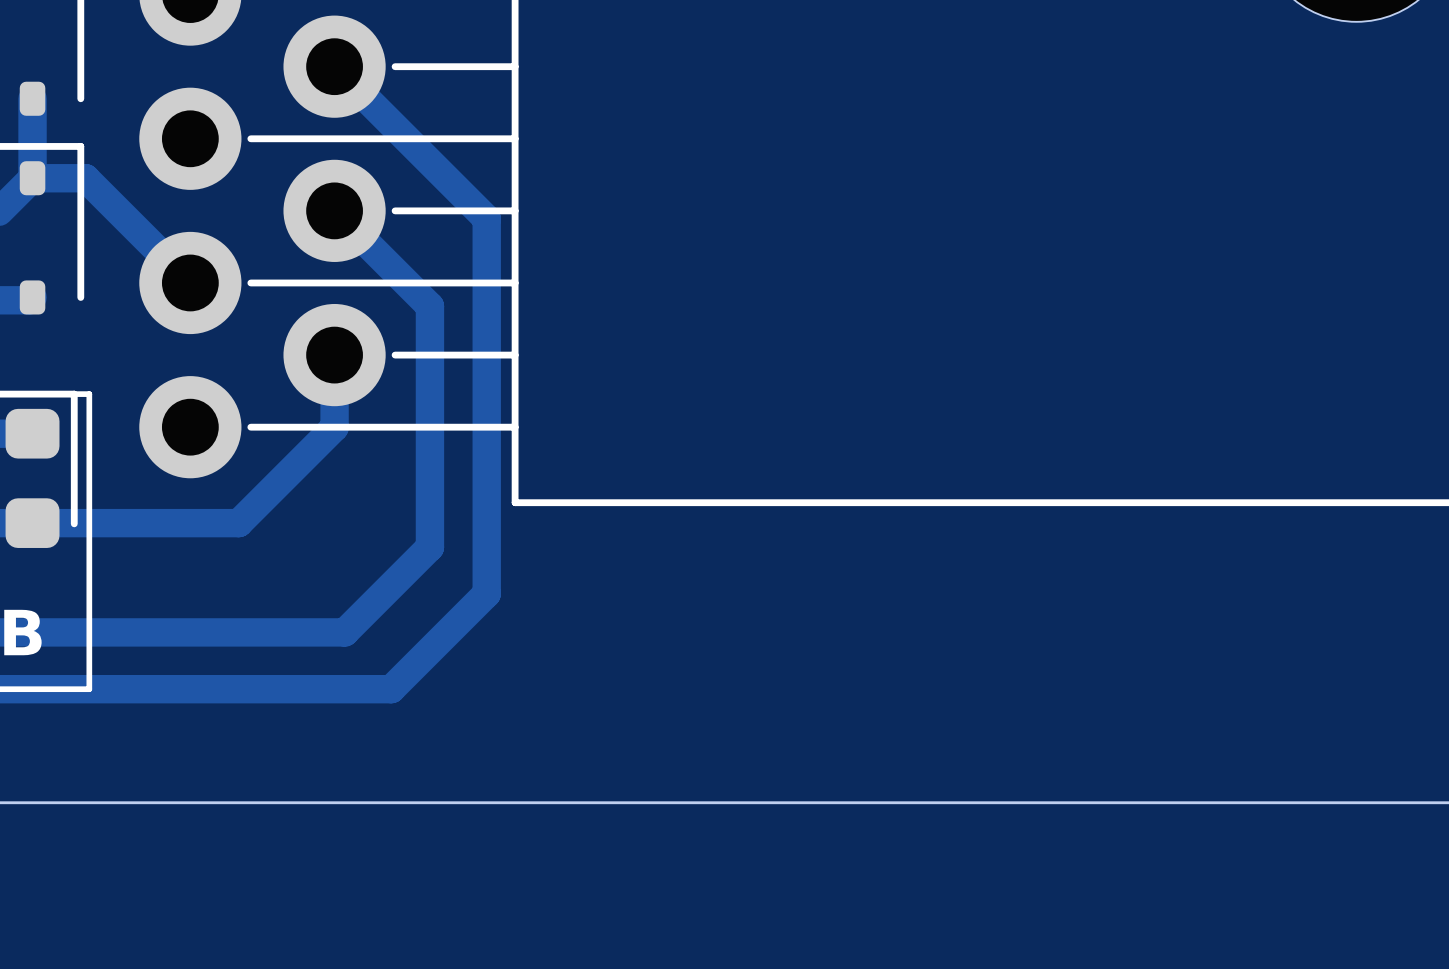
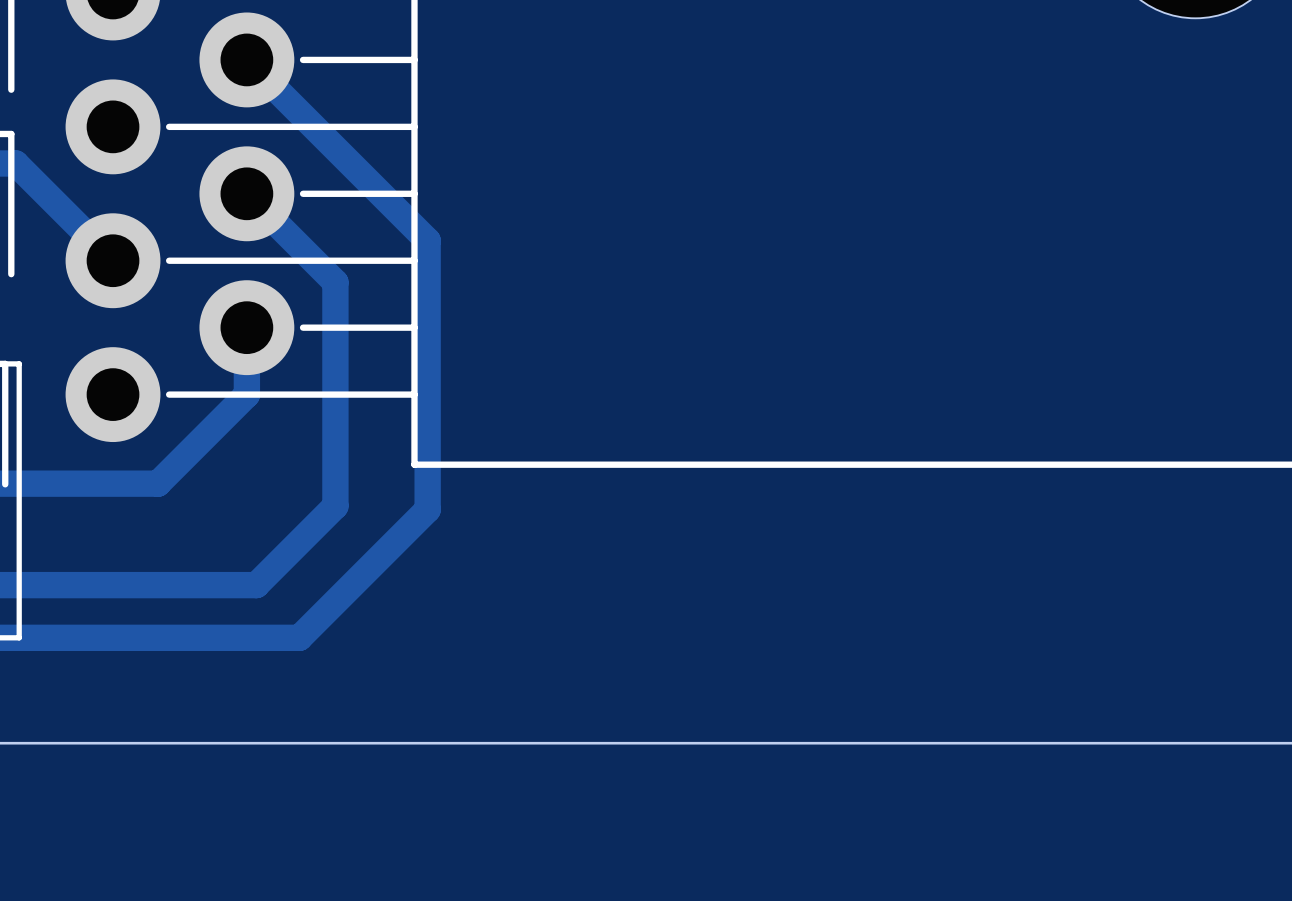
track: (486, 218) (486, 593) -> (388, 201) (427, 240) (427, 509) (388, 549)

